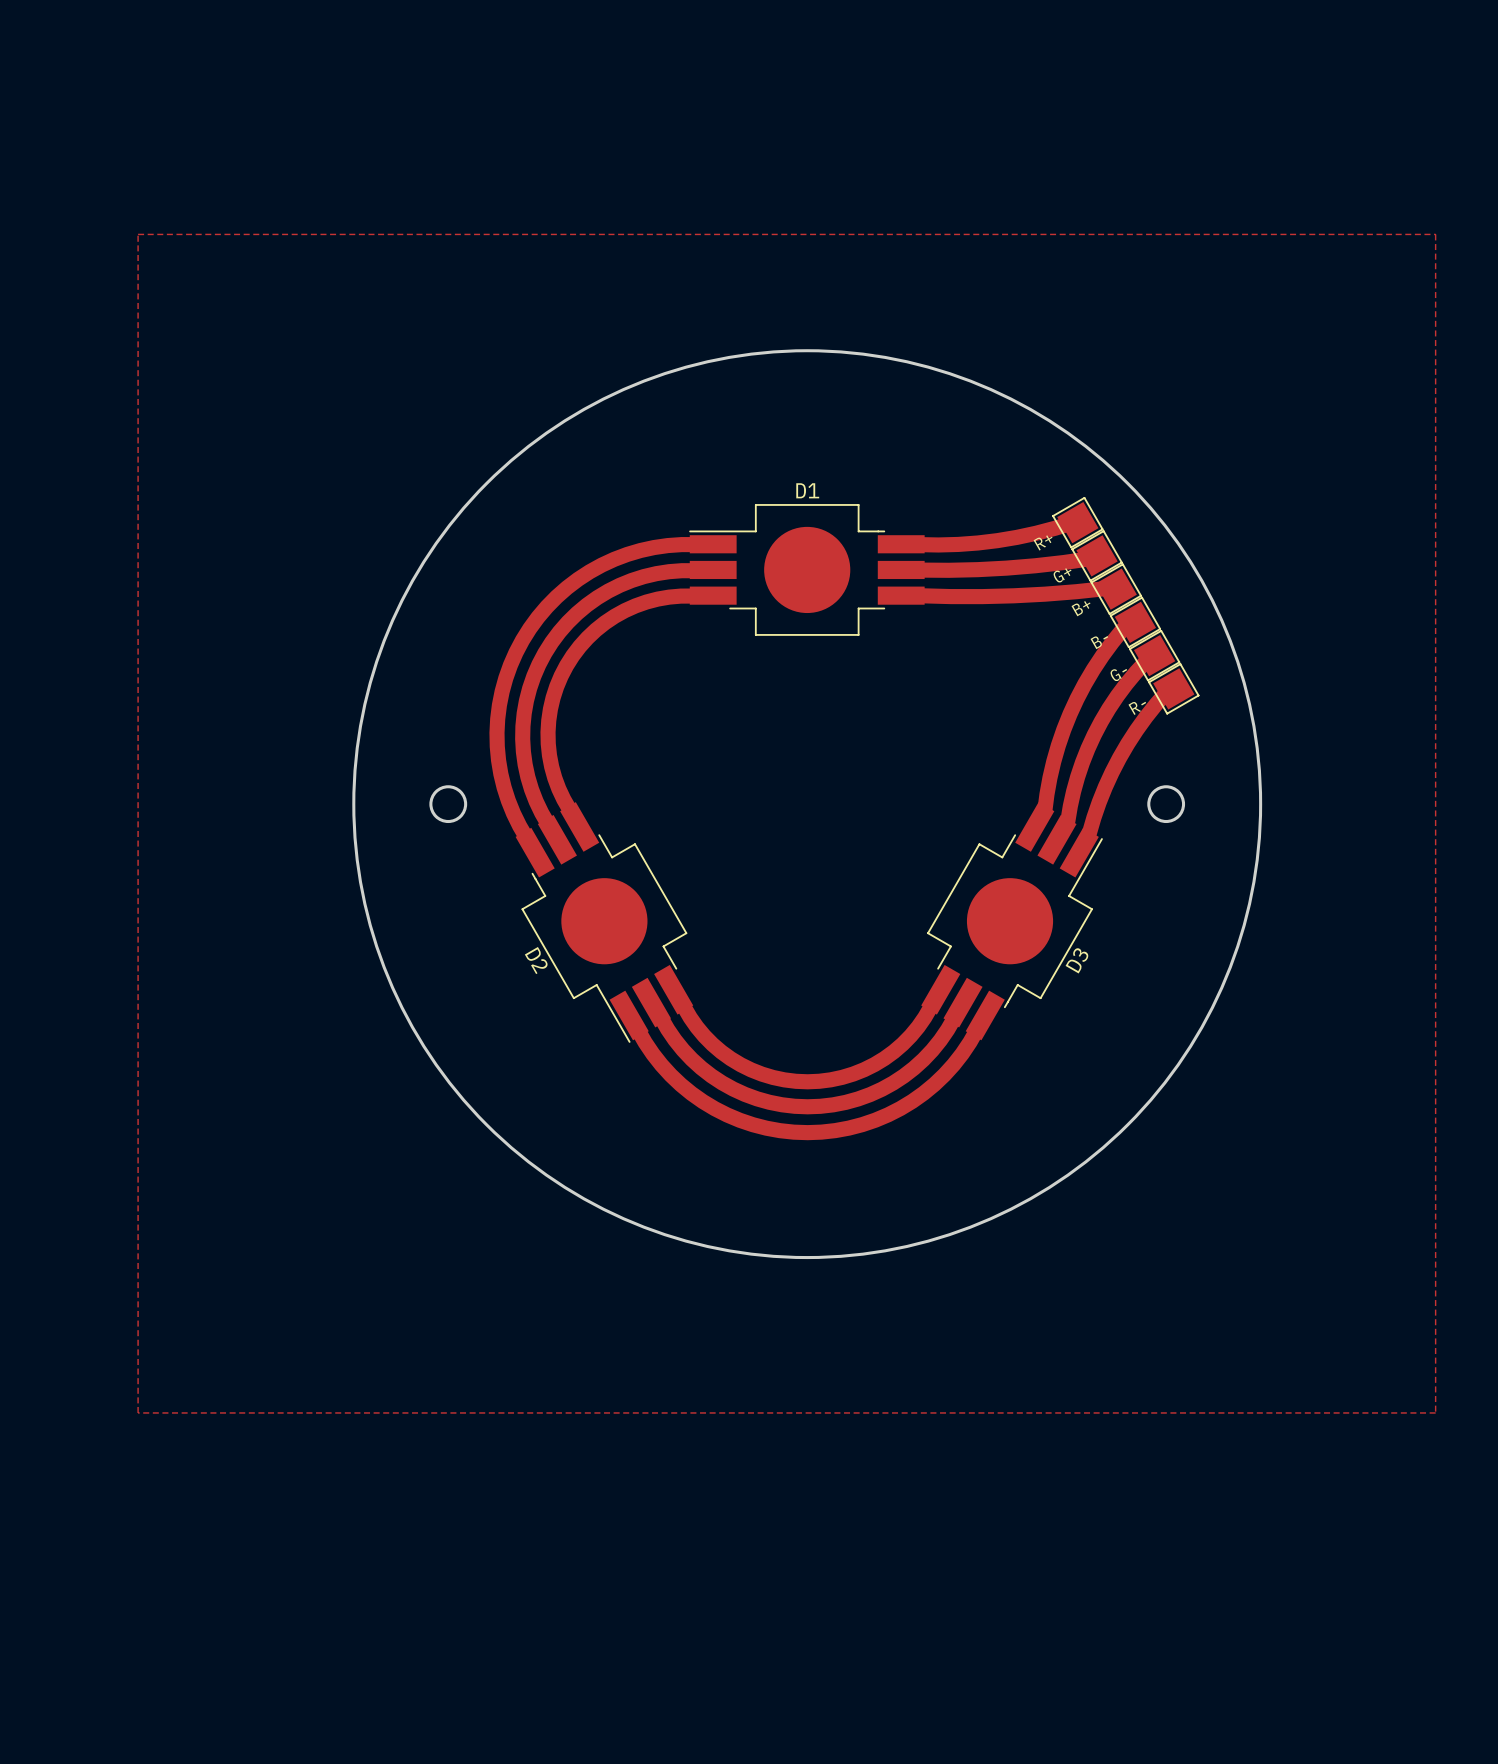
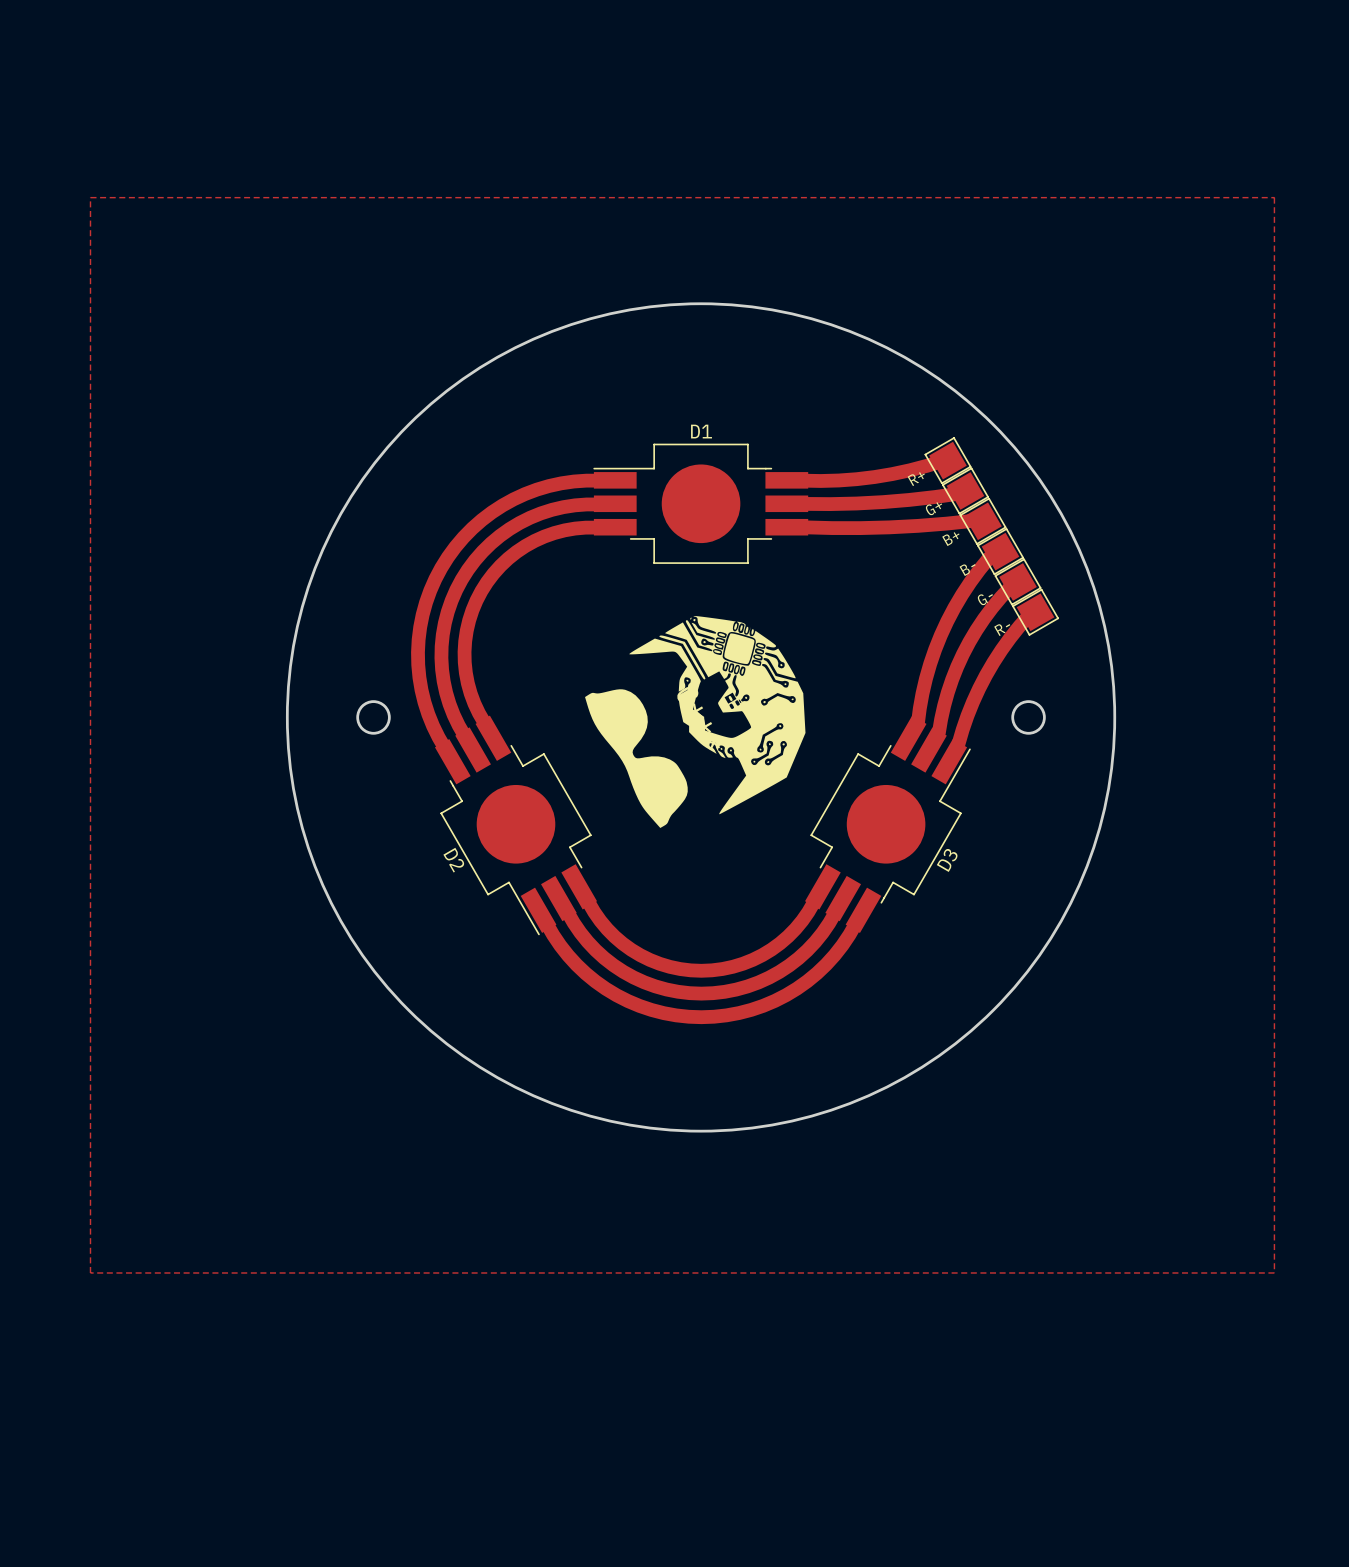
part: none -> (695, 721)

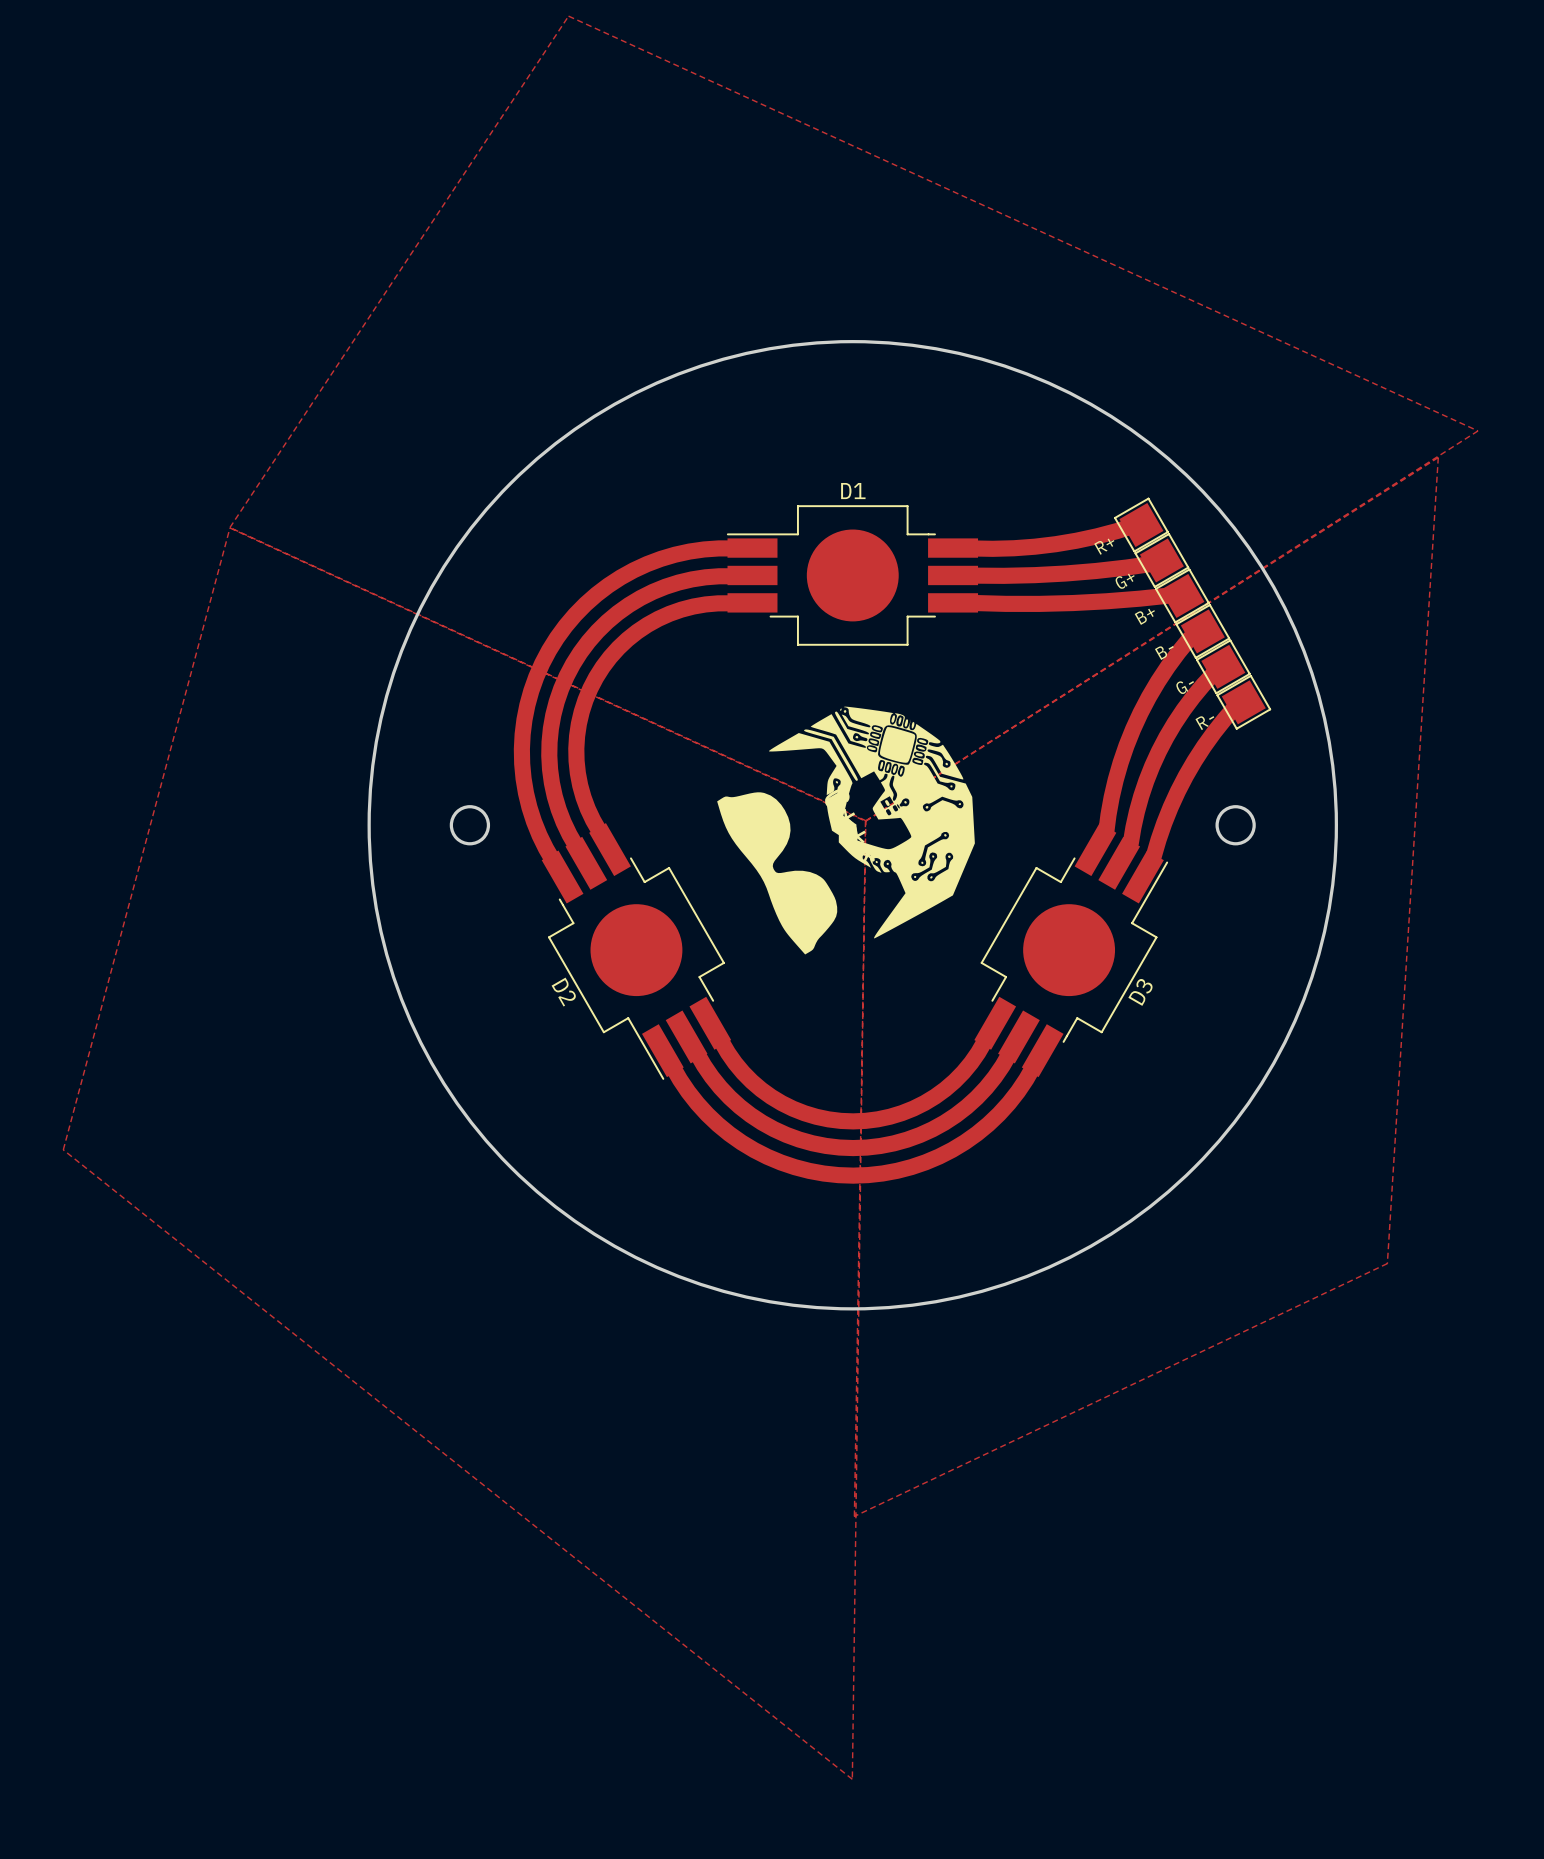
top zone outline: none -> (568, 16) (229, 527) (865, 820) (1478, 430) (568, 16)
top zone outline: (90, 197) (90, 1272) (1274, 1272) (1274, 197) (90, 197) -> none
top zone outline: none -> (1438, 457) (865, 821) (854, 1516) (1387, 1263) (1438, 457)
top zone outline: none -> (229, 527) (63, 1149) (852, 1779) (865, 821) (229, 527)

